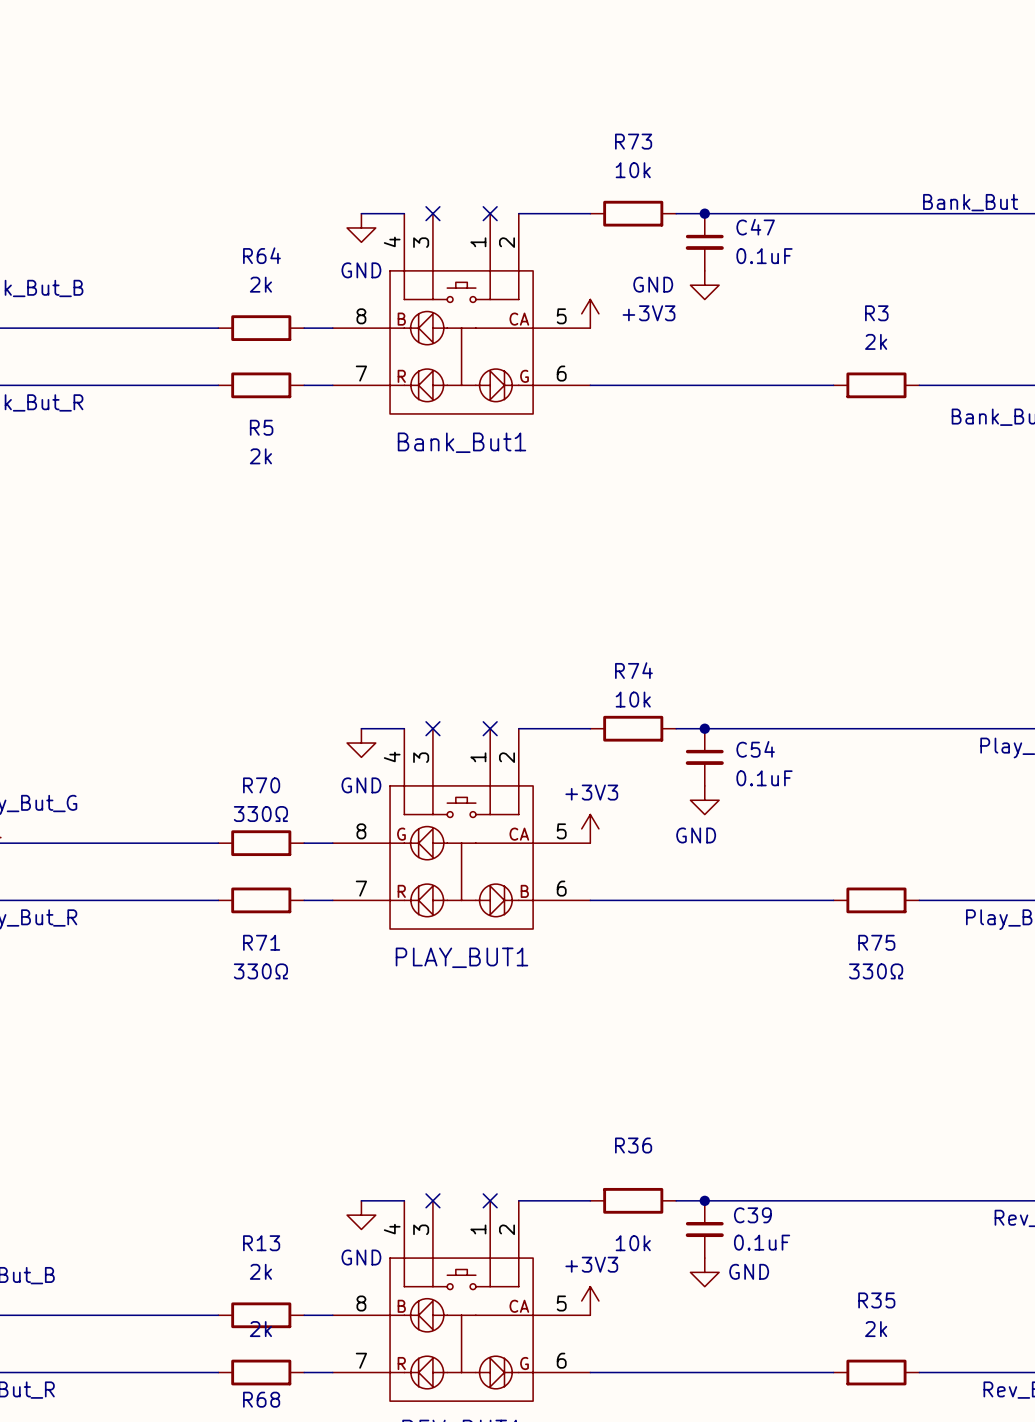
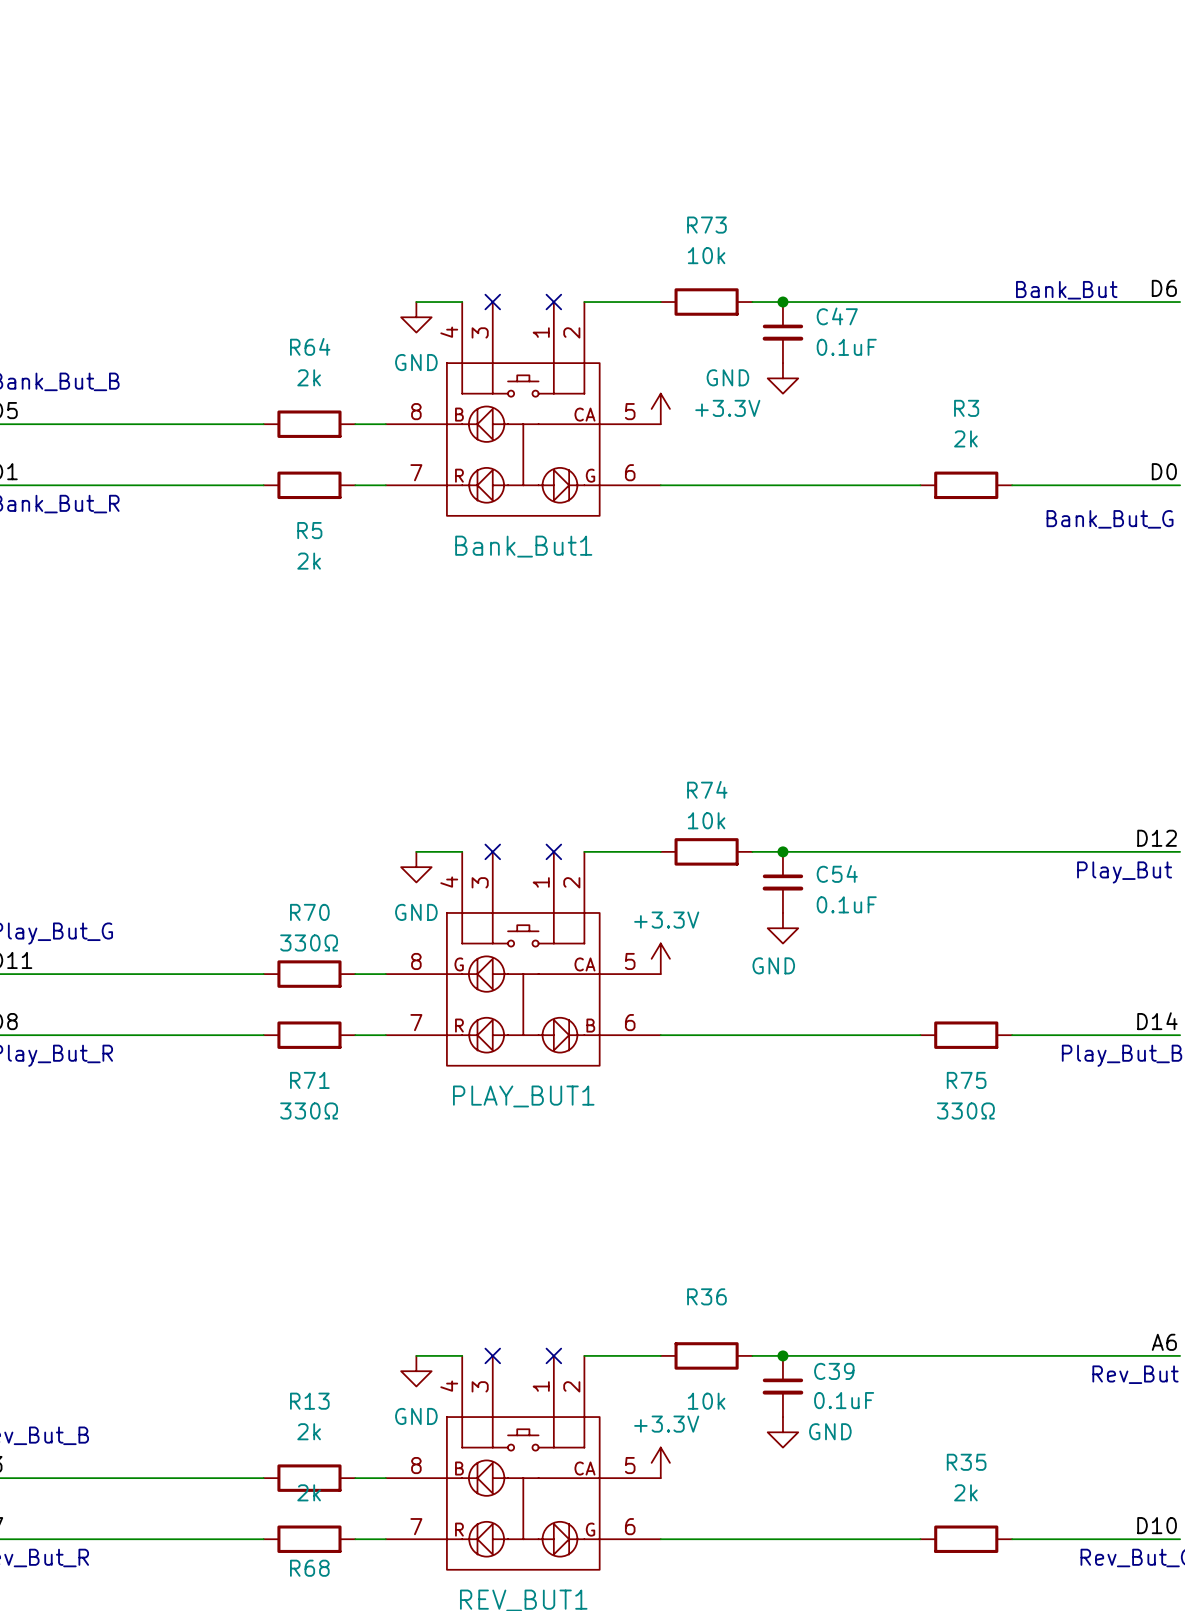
power symbol: +3V3 (590, 313) -> +3.3V (660, 408)
power symbol: +3V3 (590, 828) -> +3.3V (660, 958)
power symbol: +3V3 (590, 1300) -> +3.3V (660, 1462)

